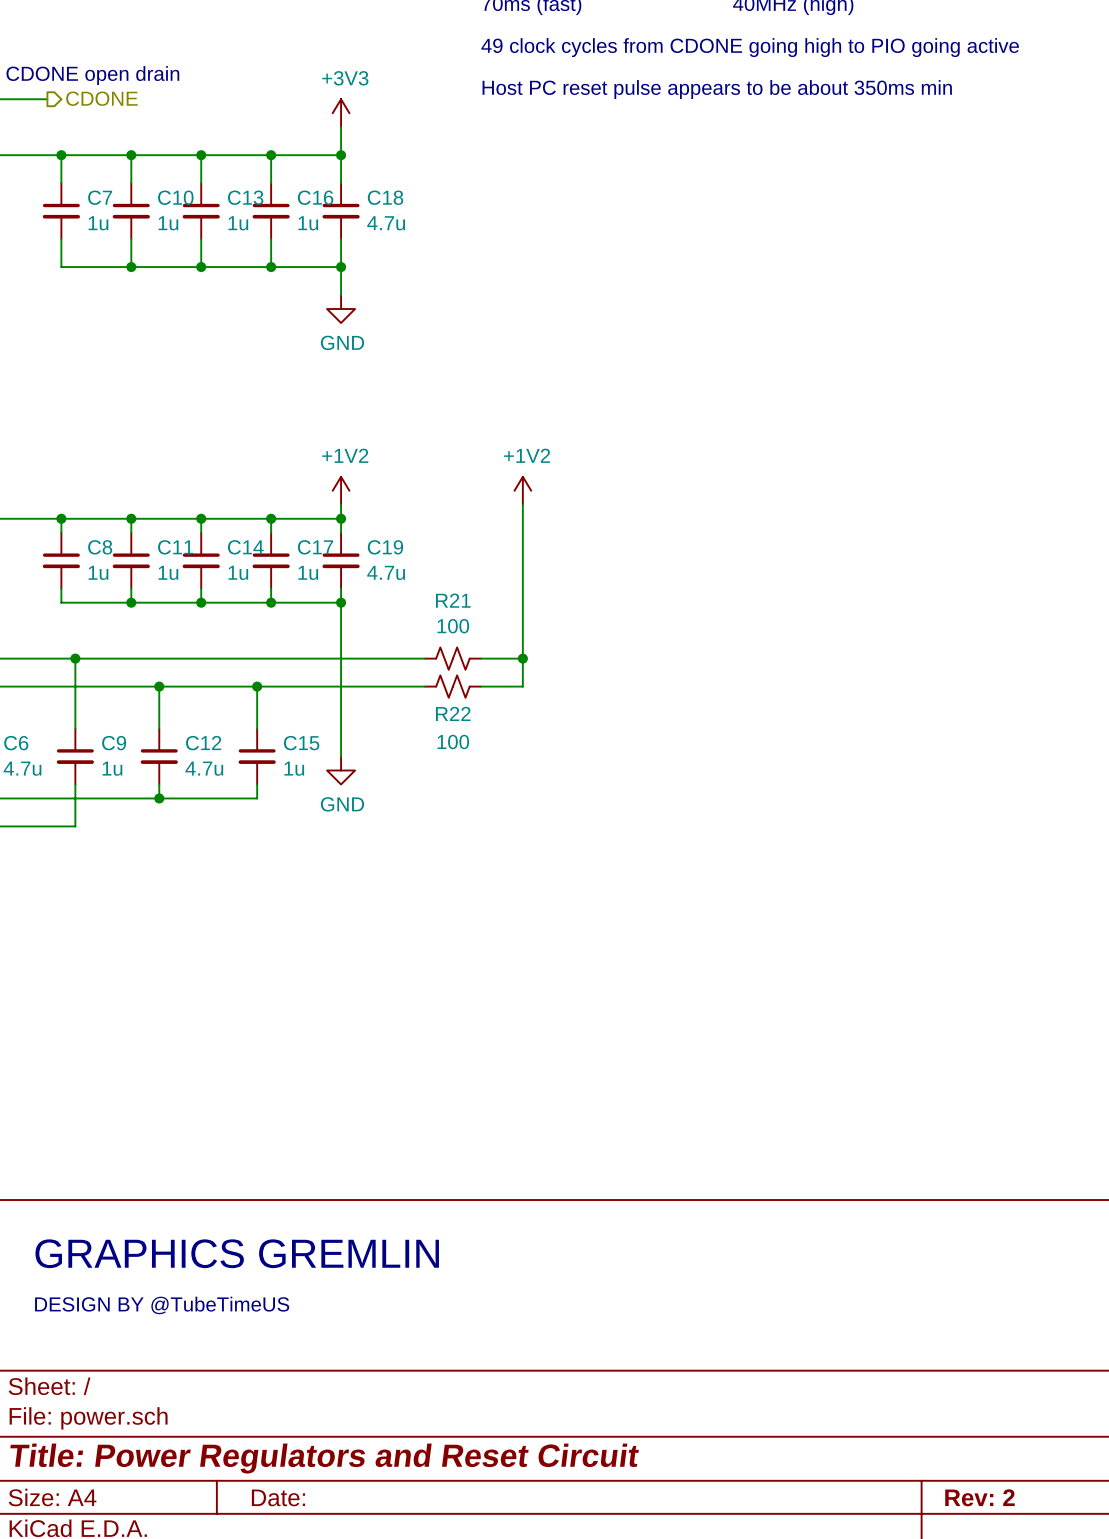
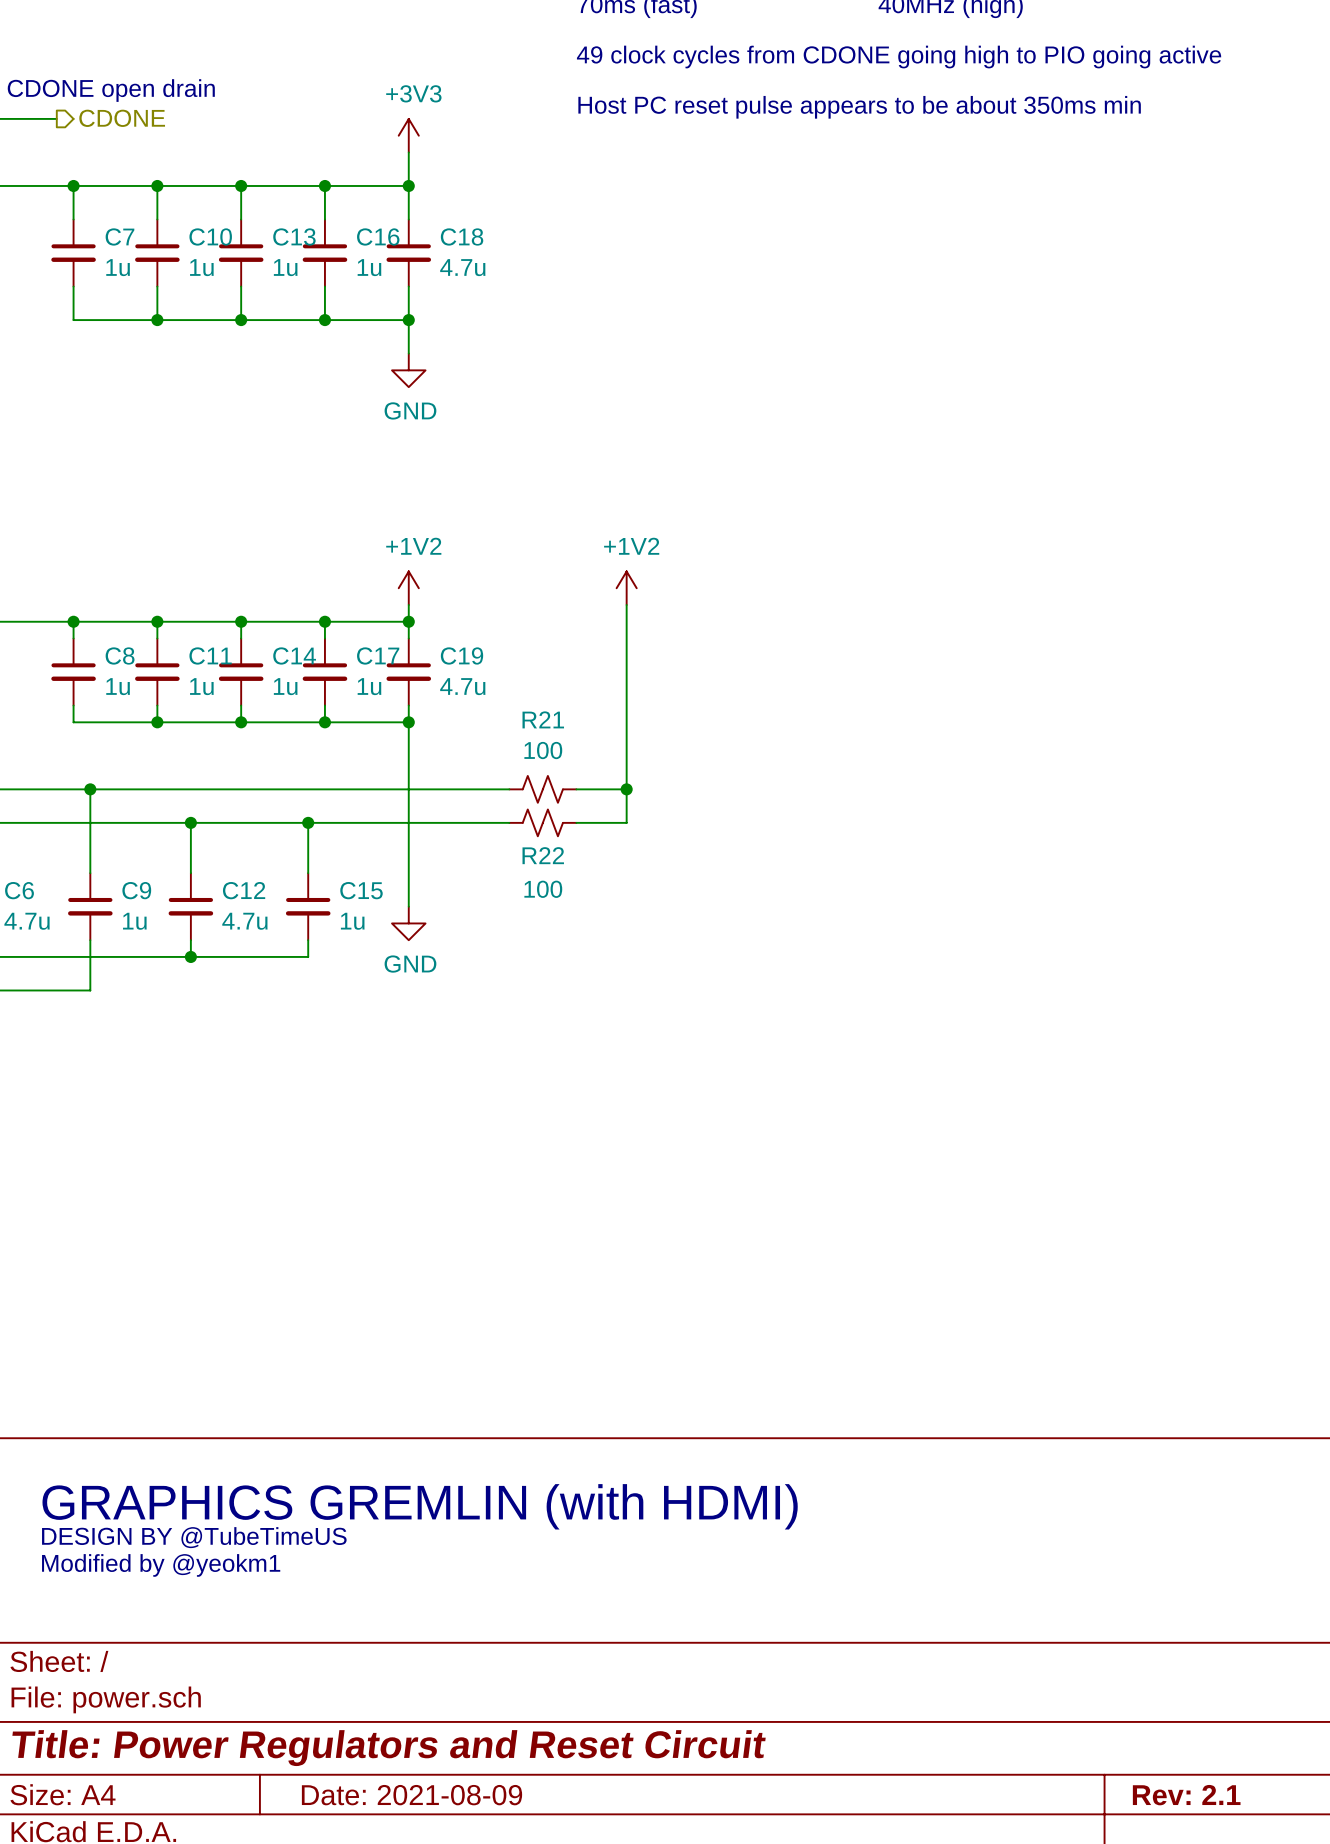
text: GRAPHICS GREMLIN (237, 1253) -> GRAPHICS GREMLIN (with HDMI) (420, 1506)
text: none -> DESIGN BY @TubeTimeUS (194, 1537)
text: DESIGN BY @TubeTimeUS (162, 1305) -> Modified by @yeokm1 (161, 1565)
title block: Date: (278, 1497) -> Date: 2021-08-09 (412, 1795)
title block: Rev: 2 (979, 1497) -> Rev: 2.1 (1186, 1795)

